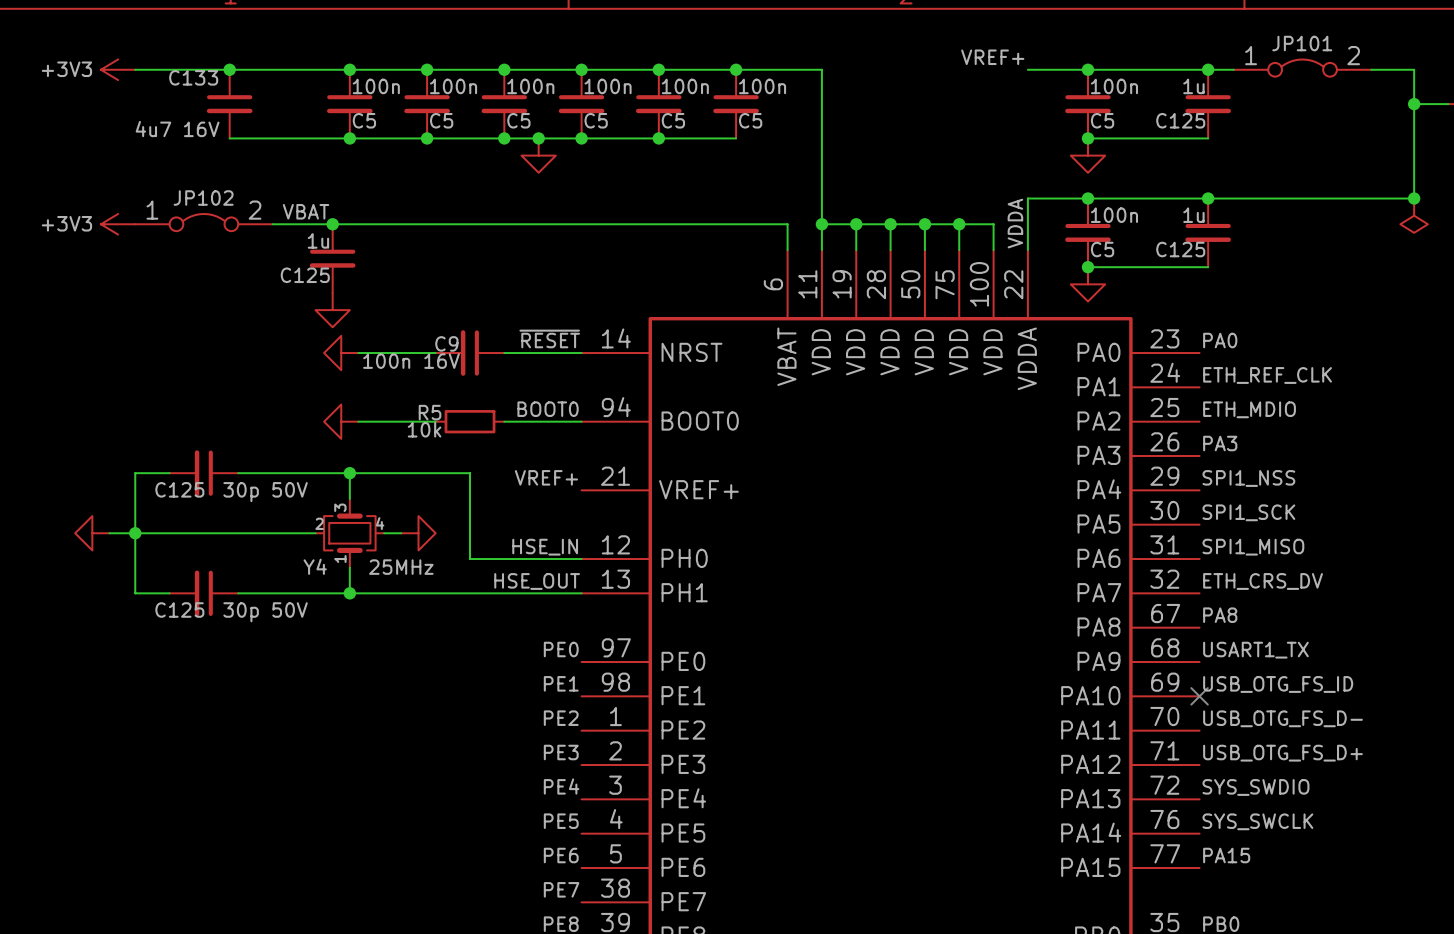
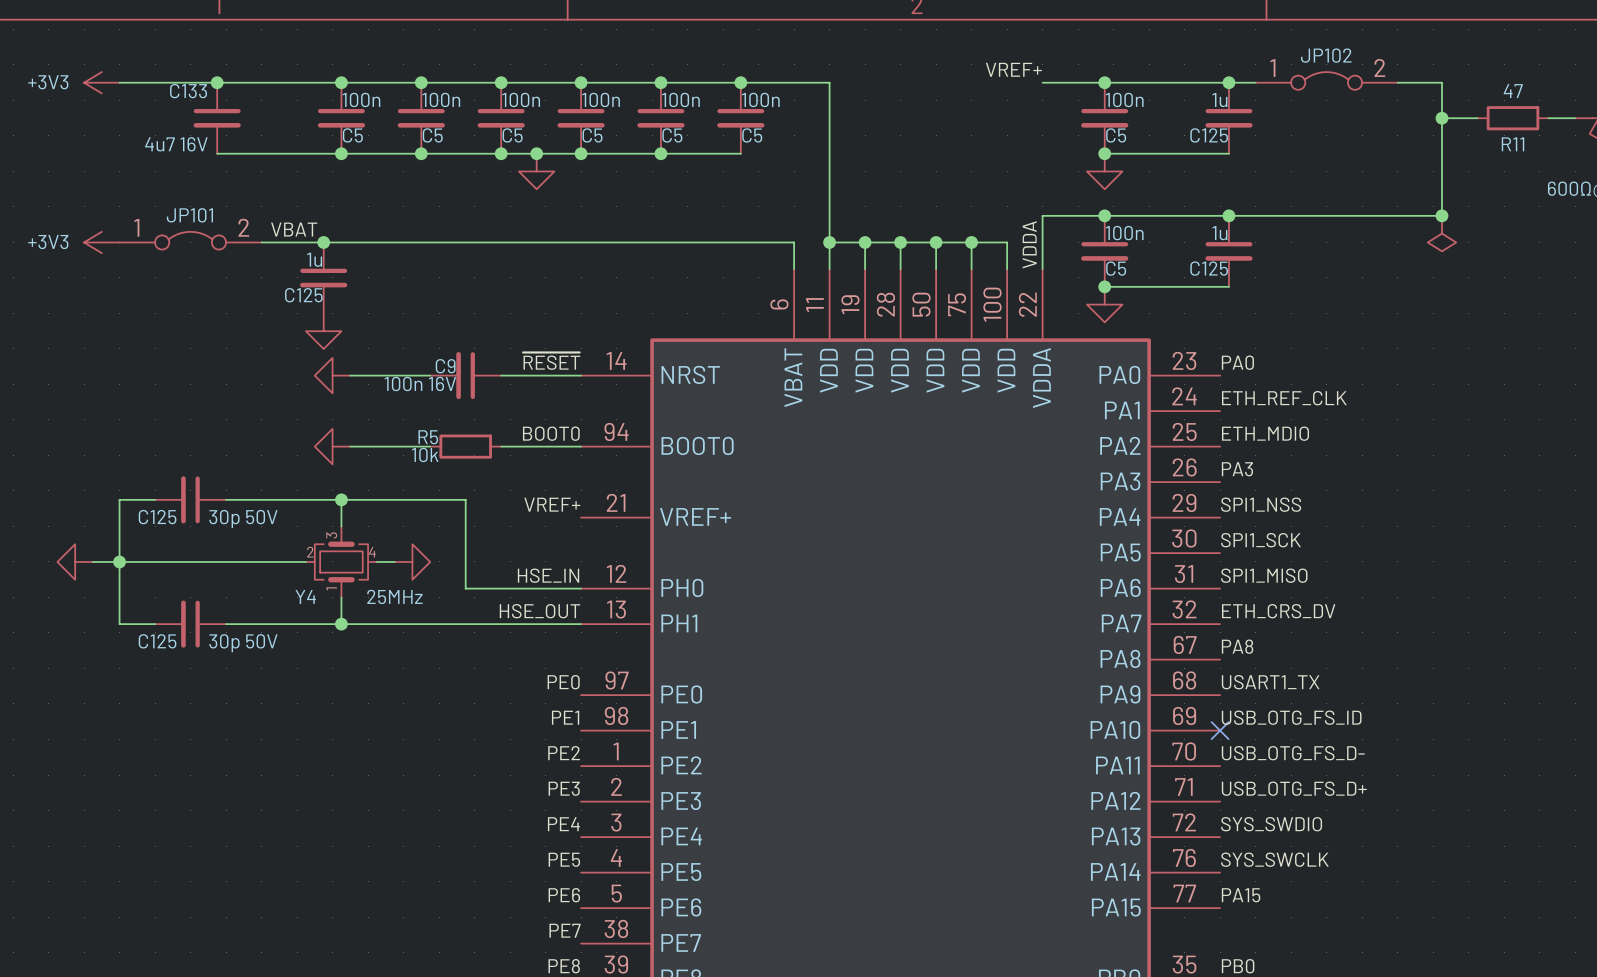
JP101 name: JP101 (1302, 43) -> JP102 (1326, 55)
JP102 name: JP102 (203, 198) -> JP101 (189, 215)

